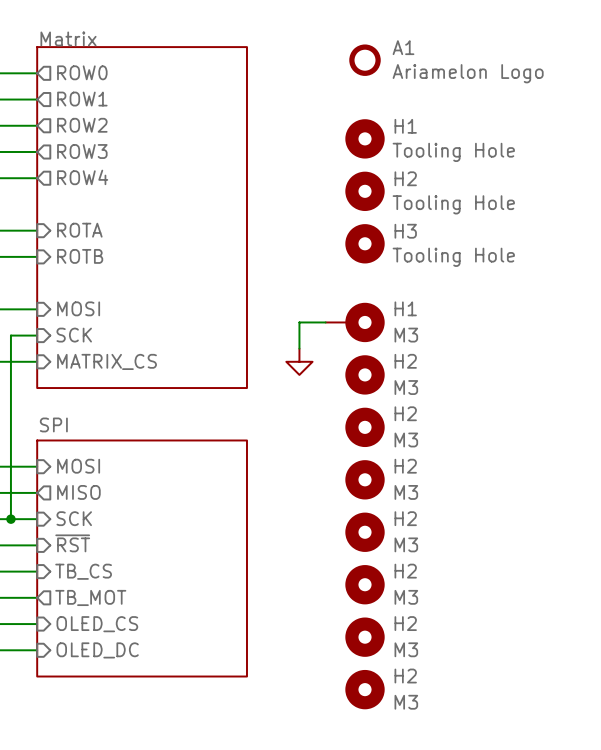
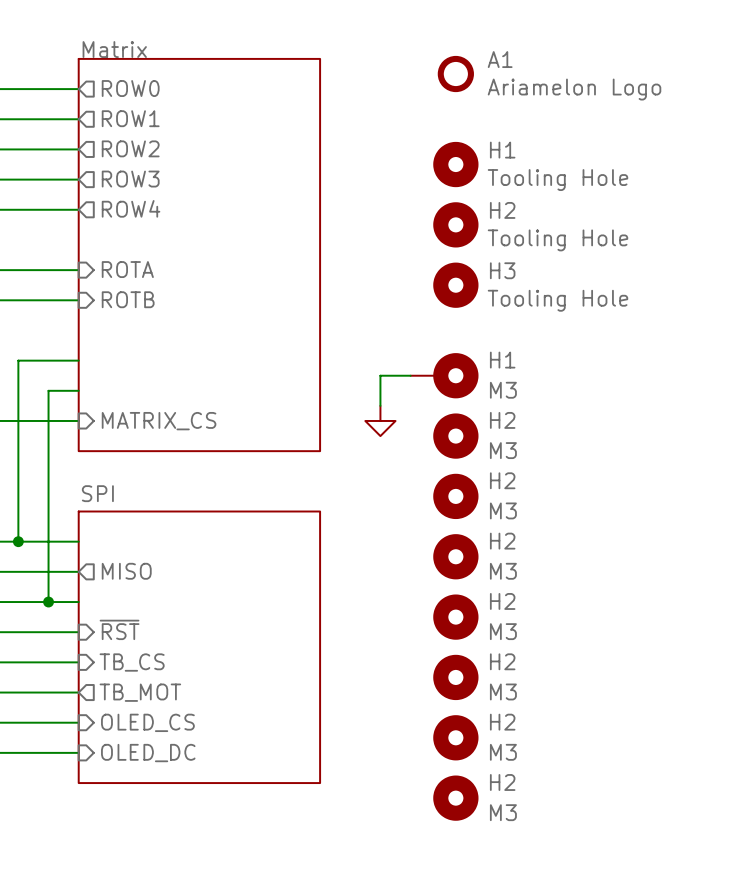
sheet pin: MOSI (78, 308) -> none
sheet pin: SCK (74, 335) -> none
sheet pin: MOSI (78, 466) -> none
sheet pin: SCK (74, 518) -> none

